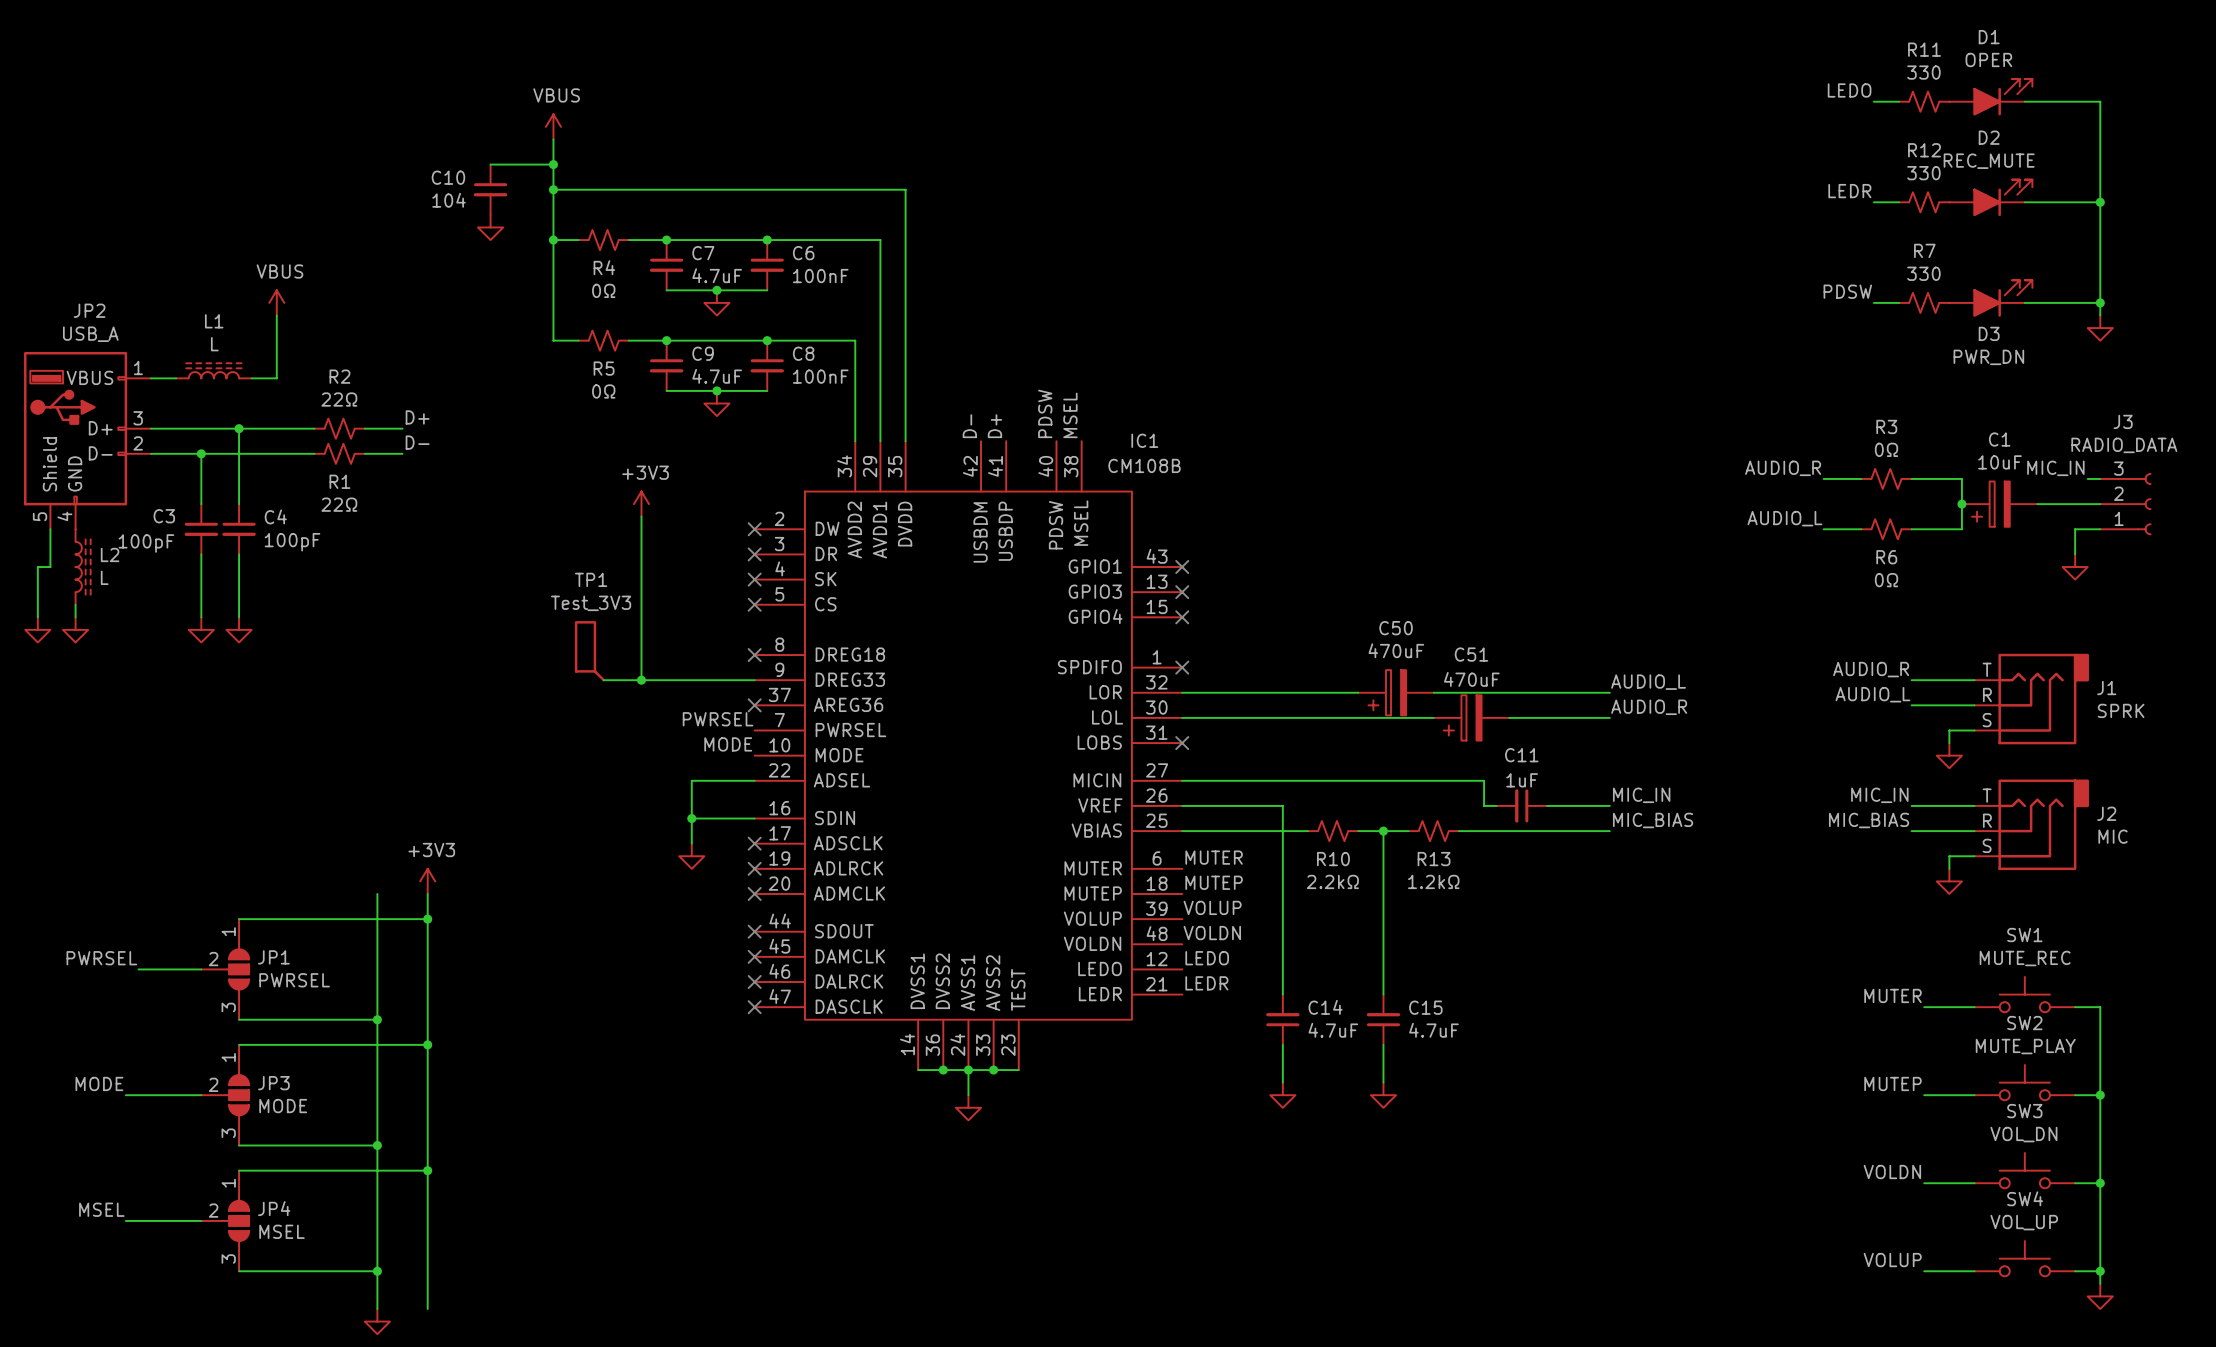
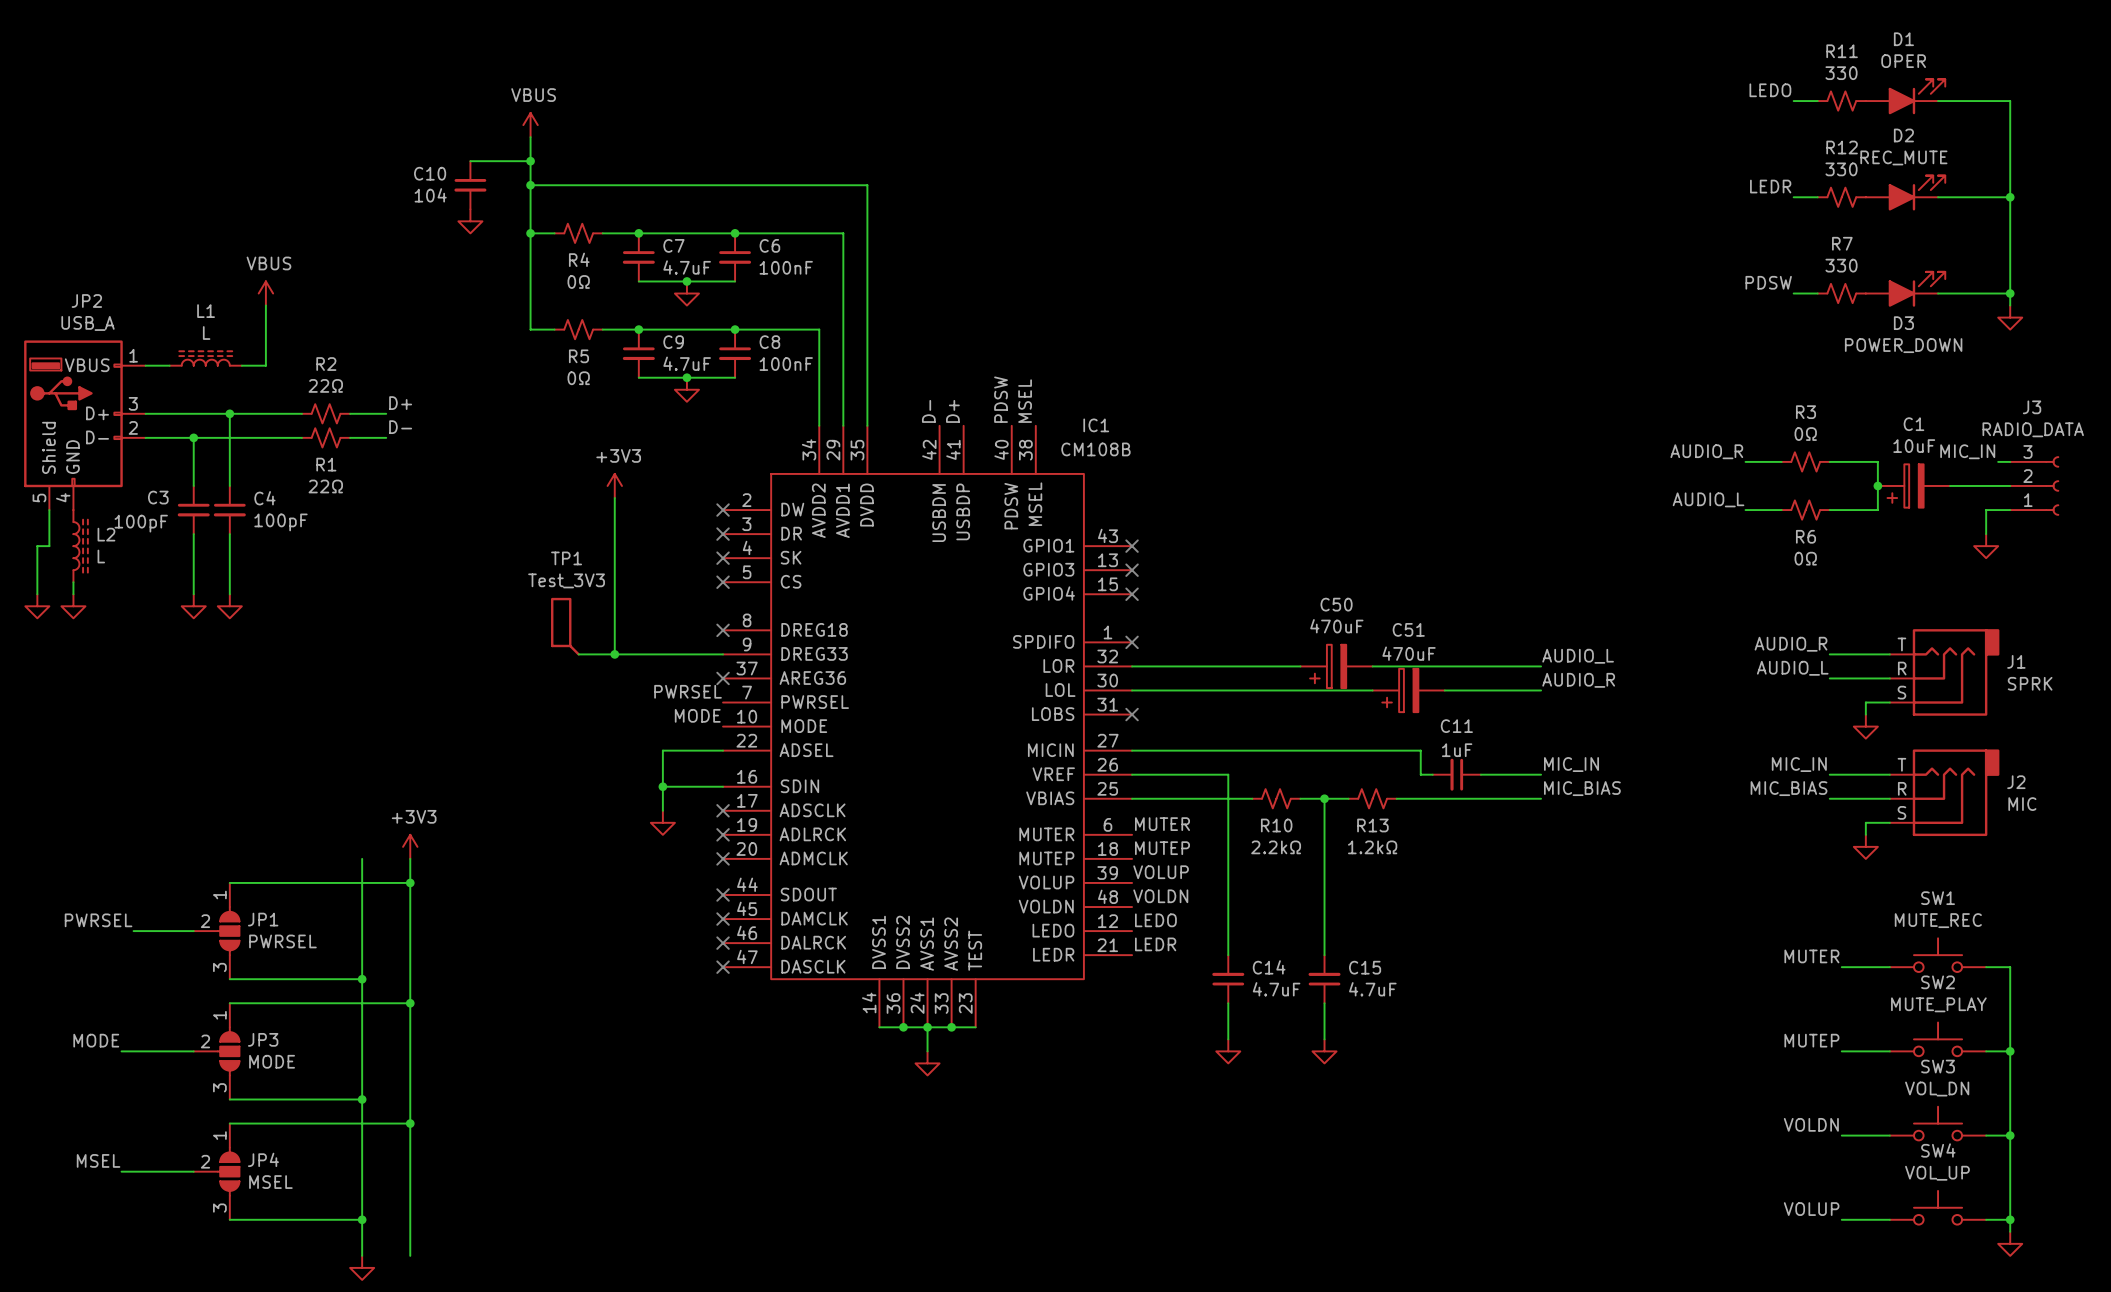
D3 value: PWR_DN (1988, 357) -> POWER_DOWN (1903, 345)

